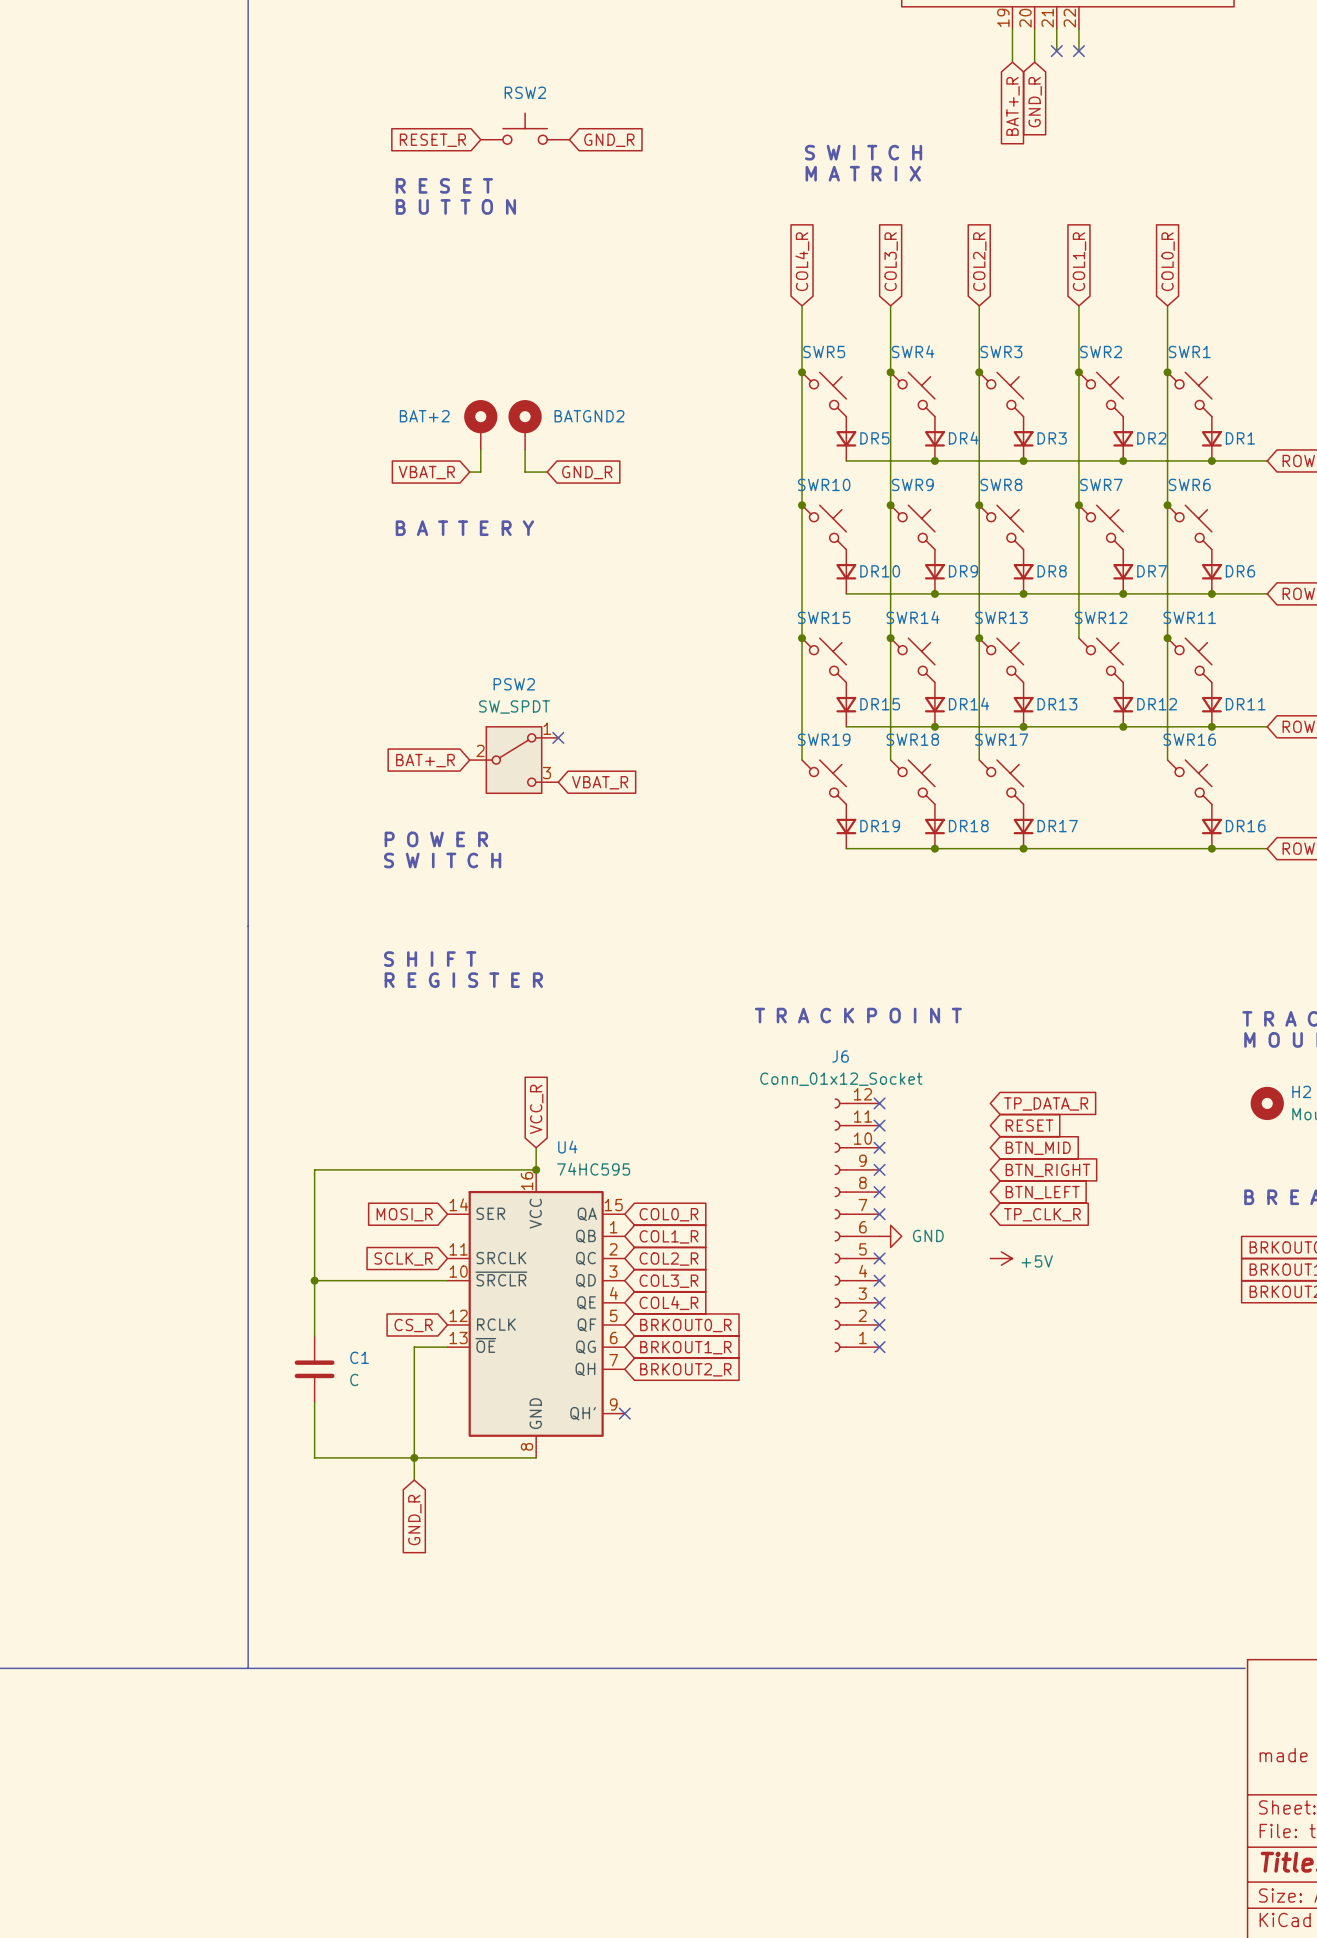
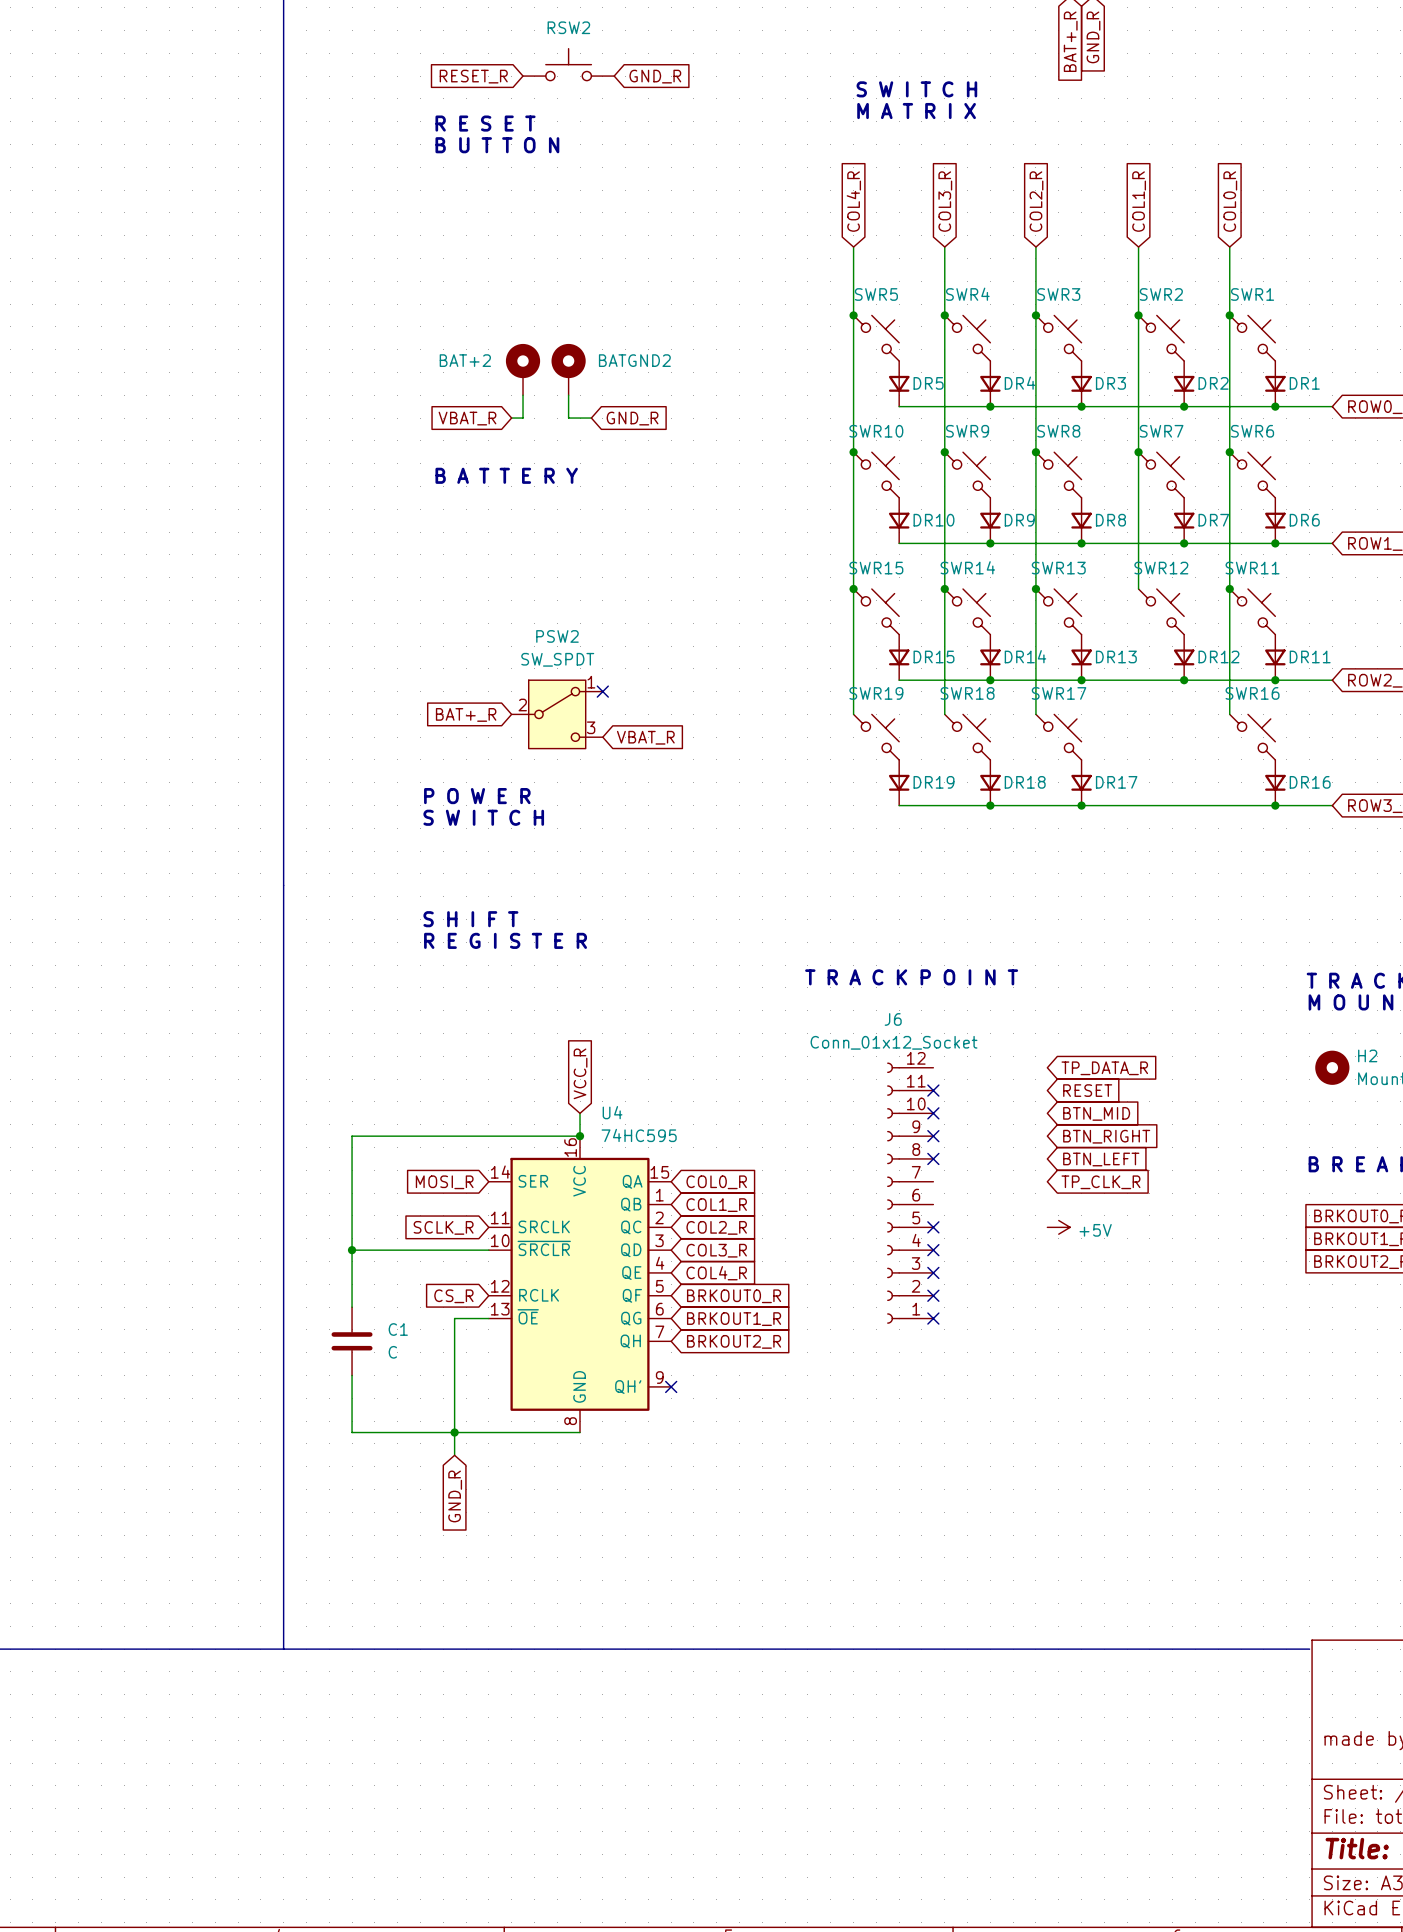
no-connect mark: (879, 1103) -> none
no-connect mark: (879, 1214) -> none
power symbol: GND (890, 1236) -> none

